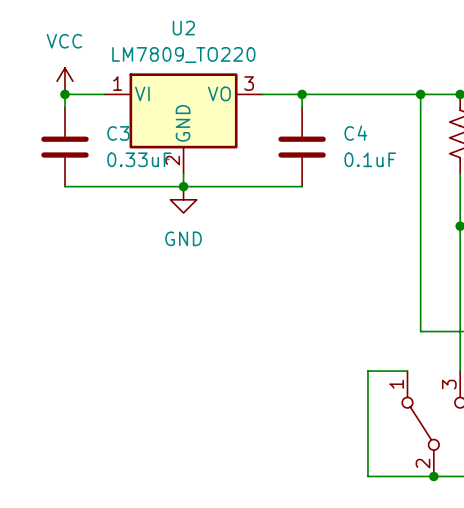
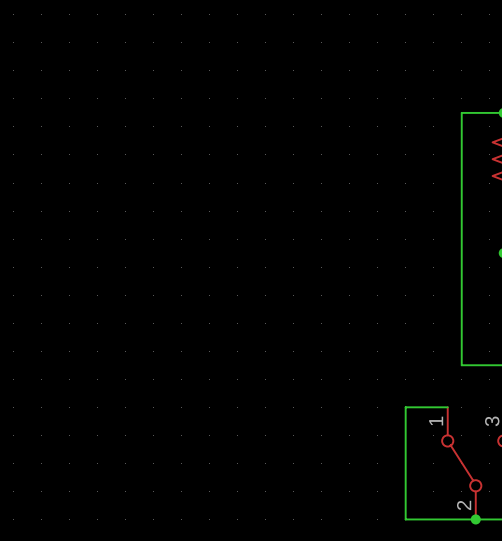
power symbol: VCC (64, 81) -> none
junction: (64, 94) -> none
wire: (104, 94) (64, 94) (64, 107) -> none
wire: (262, 94) (420, 94) -> none
wire: (302, 94) (302, 107) -> none
junction: (302, 94) -> none
junction: (420, 94) -> none
U2: LM7809_TO220 (183, 123) -> none
C3: 0.33uF (64, 147) -> none
C4: 0.1uF (302, 147) -> none
wire: (183, 173) (183, 186) -> none
wire: (64, 186) (302, 186) -> none
junction: (183, 186) -> none
power symbol: GND (183, 199) -> none

